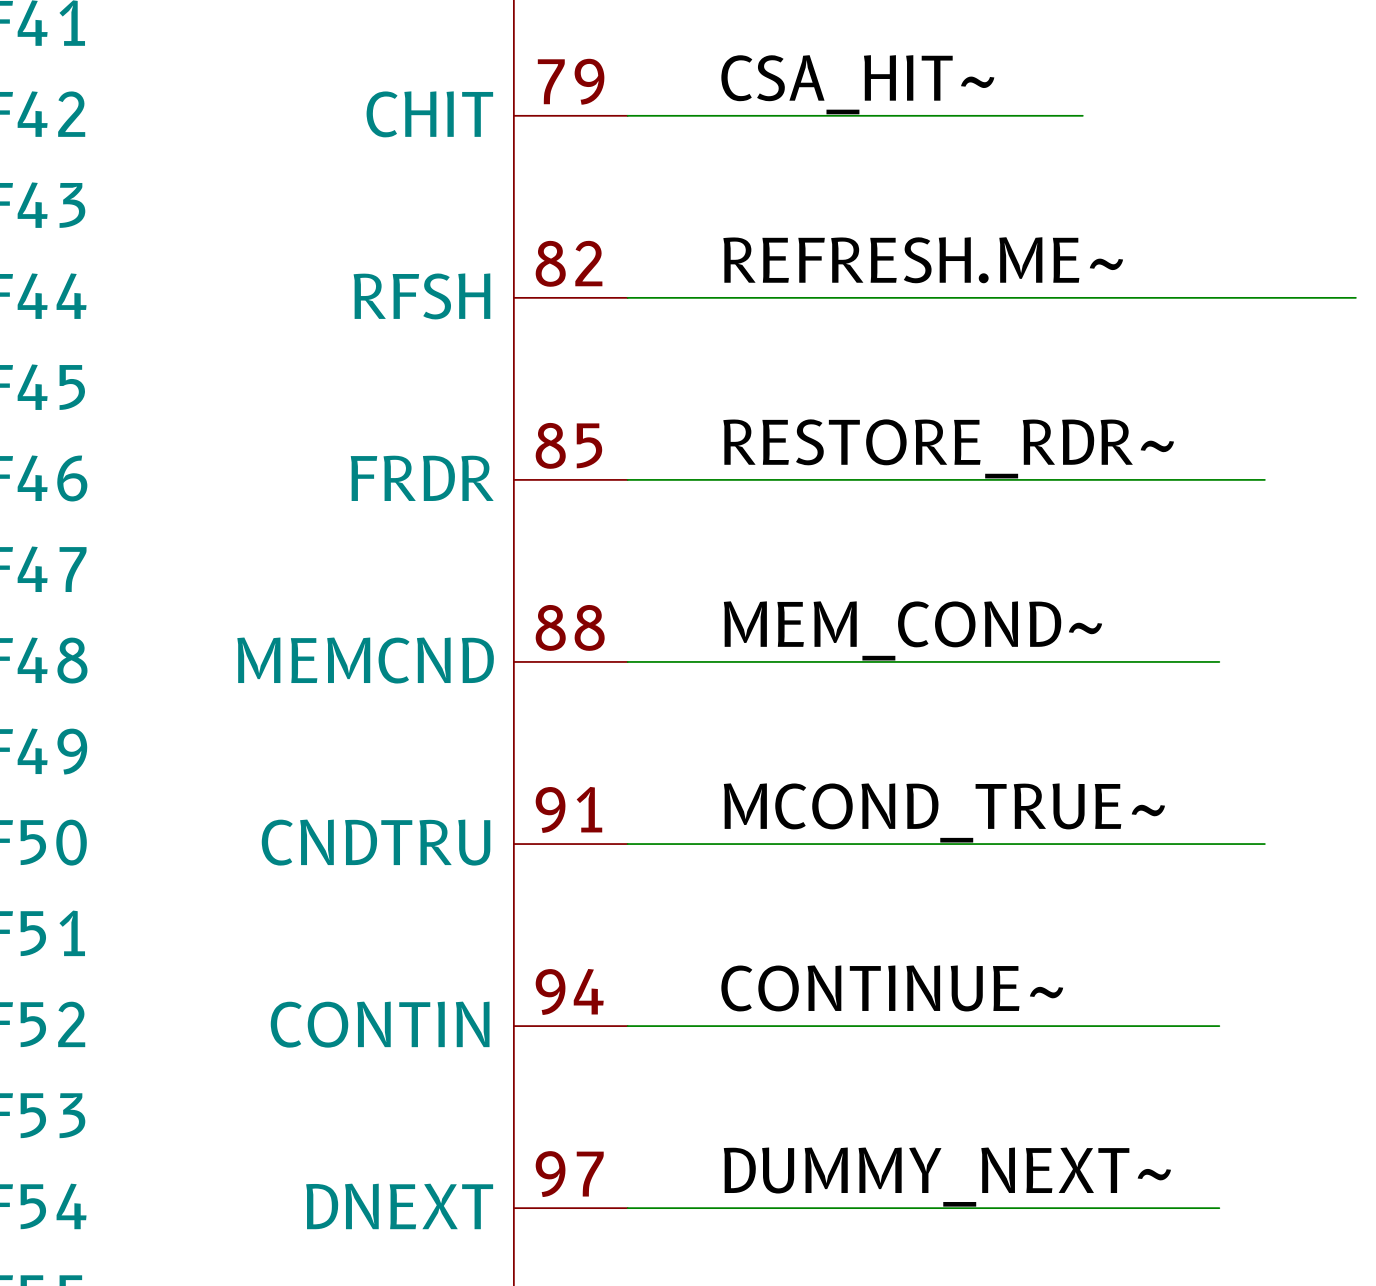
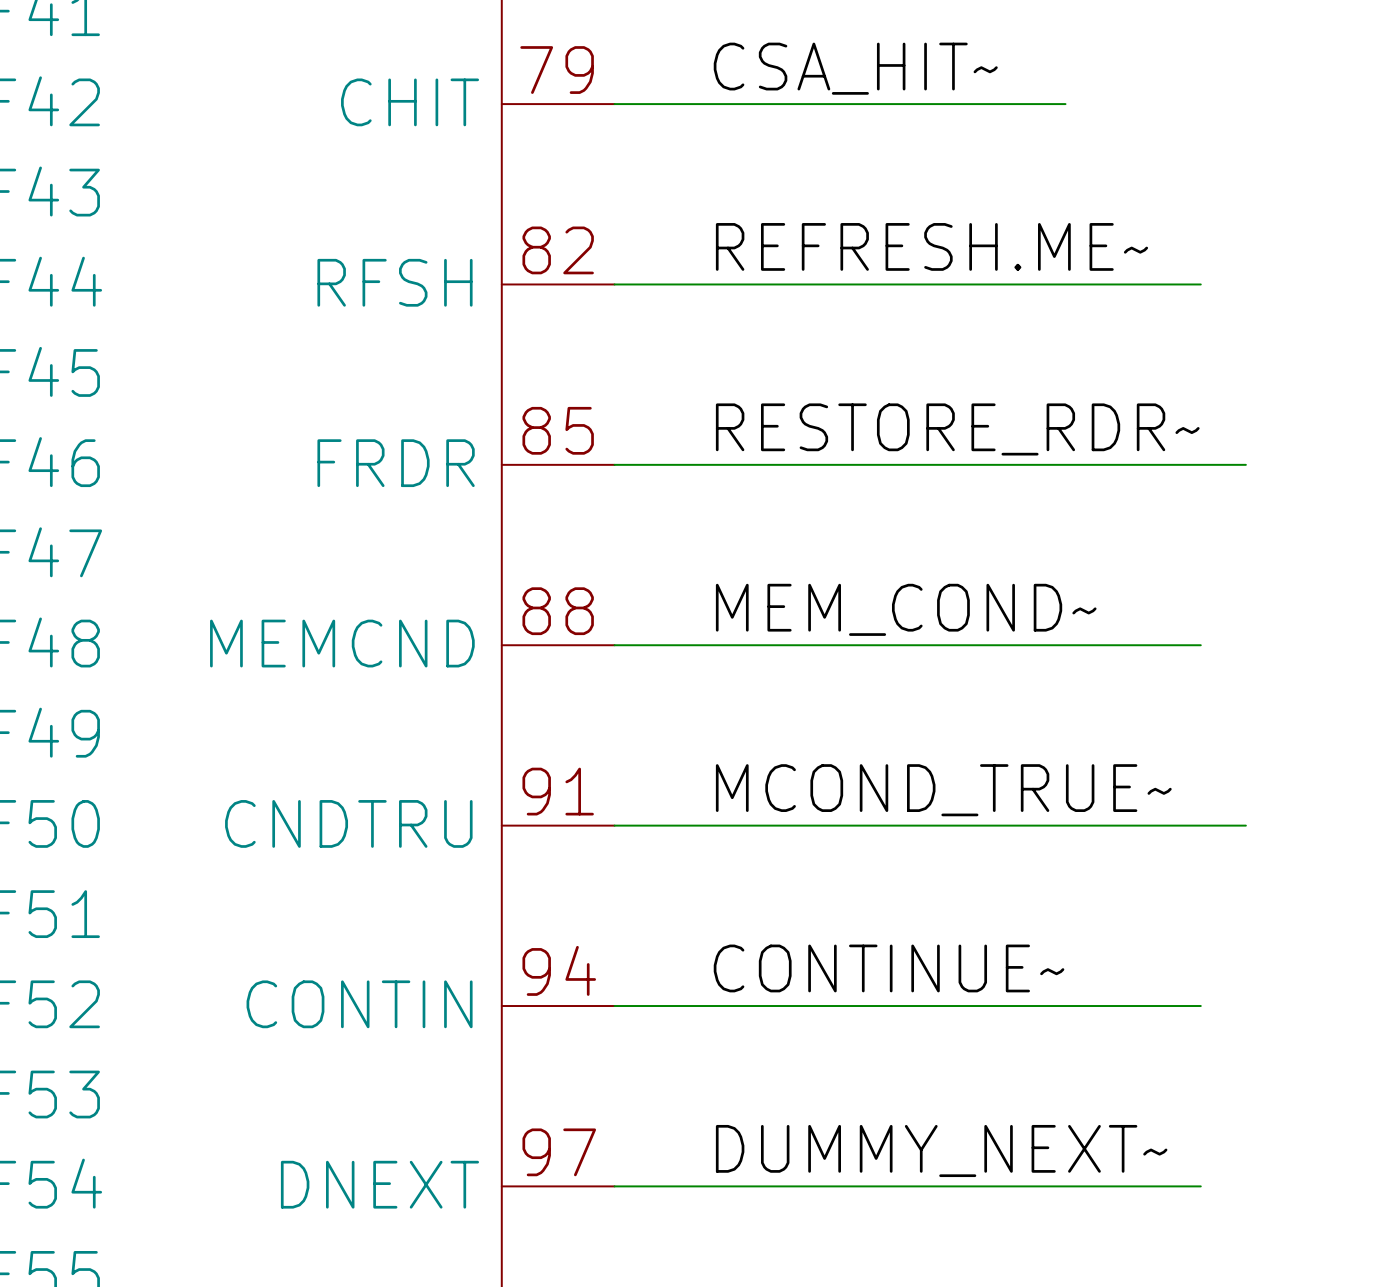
wire: (1219, 297) (1355, 297) -> none

